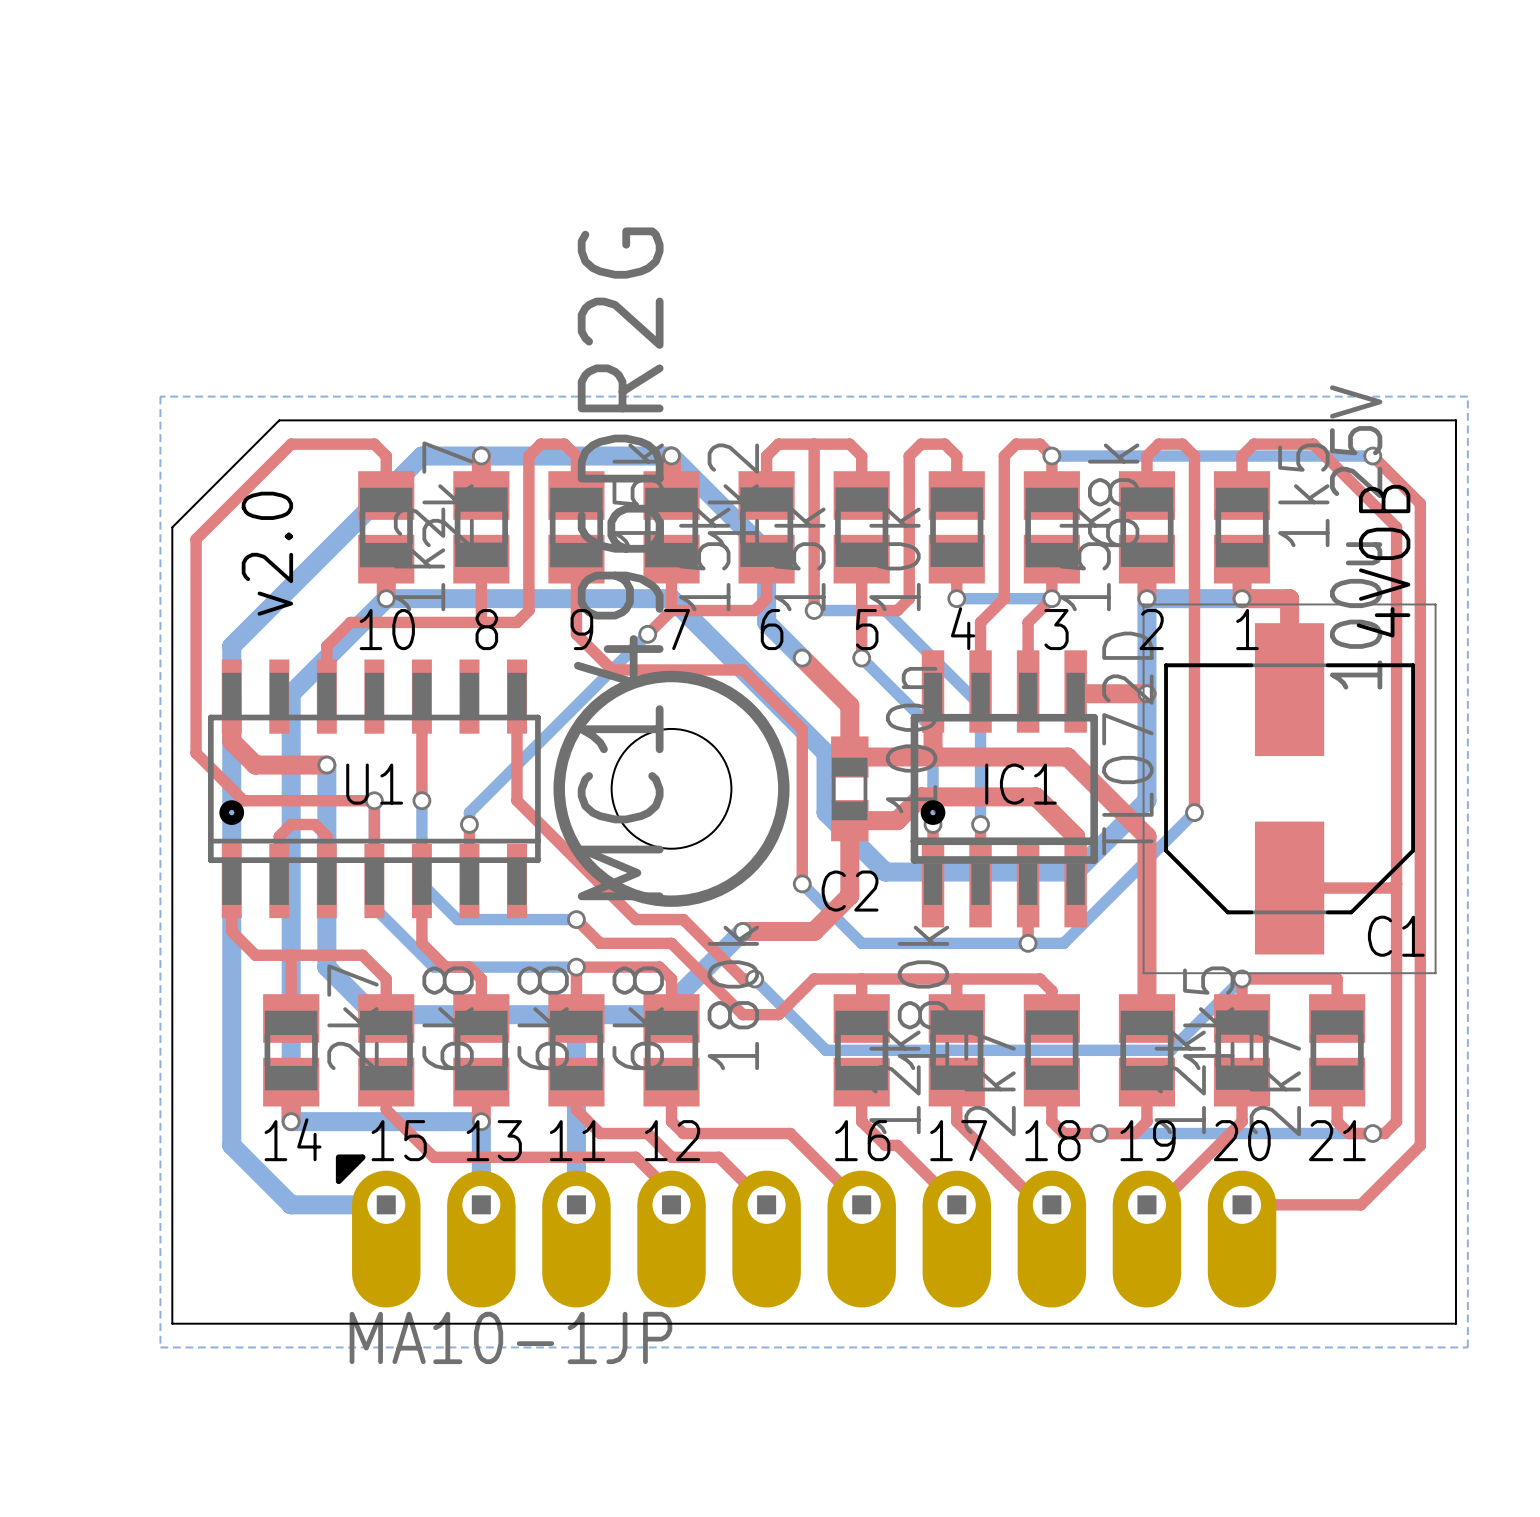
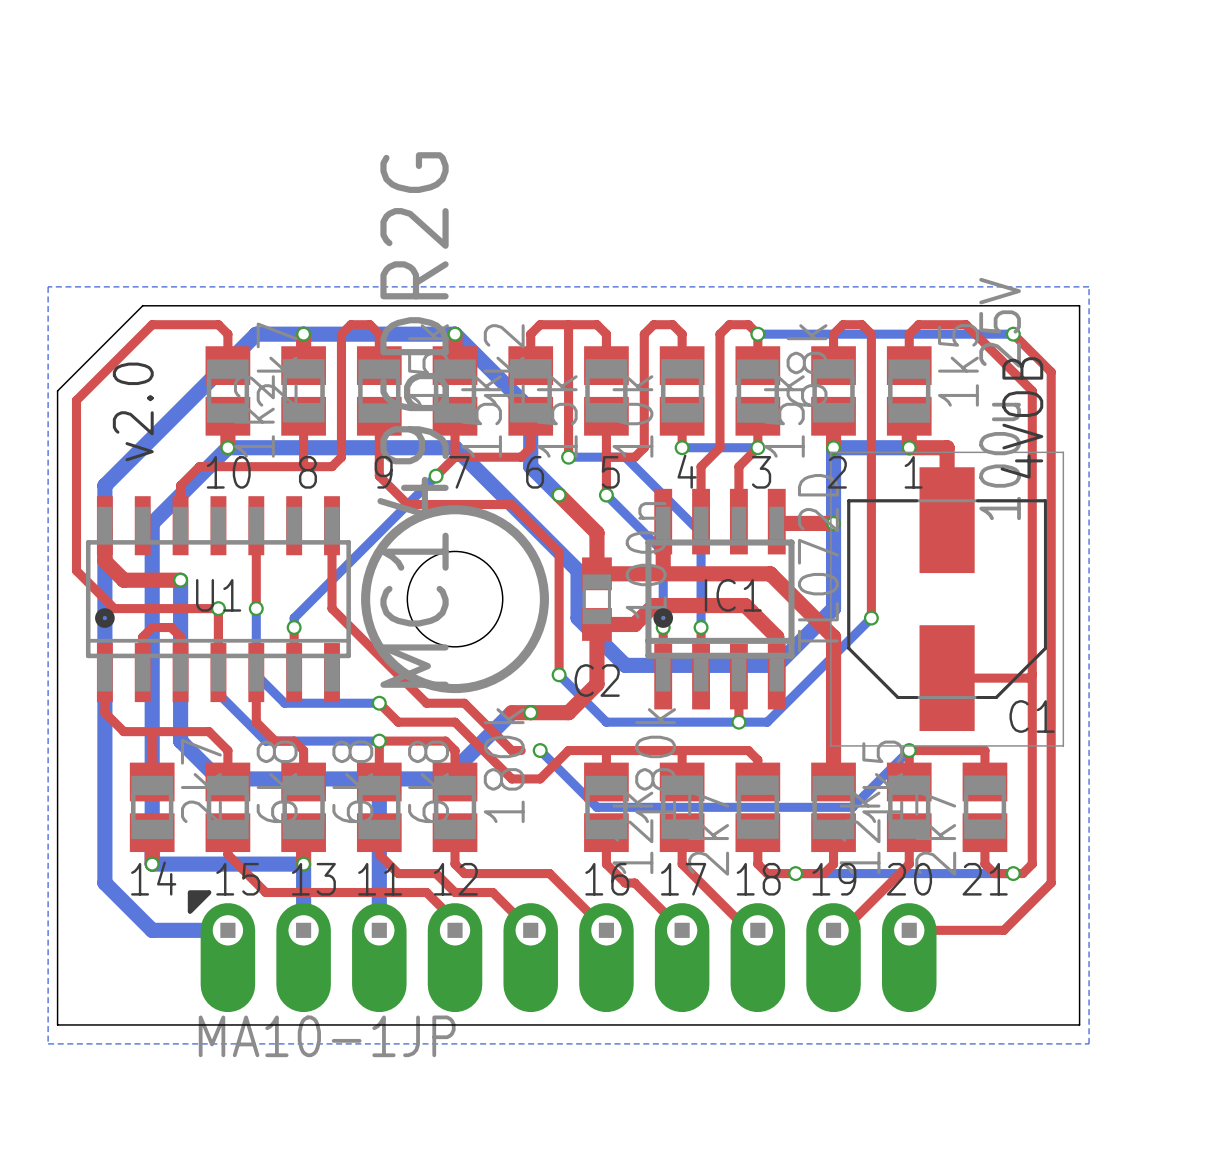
via position: (742, 931) -> (530, 712)
bottom track: (754, 979) (826, 1050) (849, 1050) -> (540, 750) (596, 807)
via position: (754, 979) -> (540, 750)

